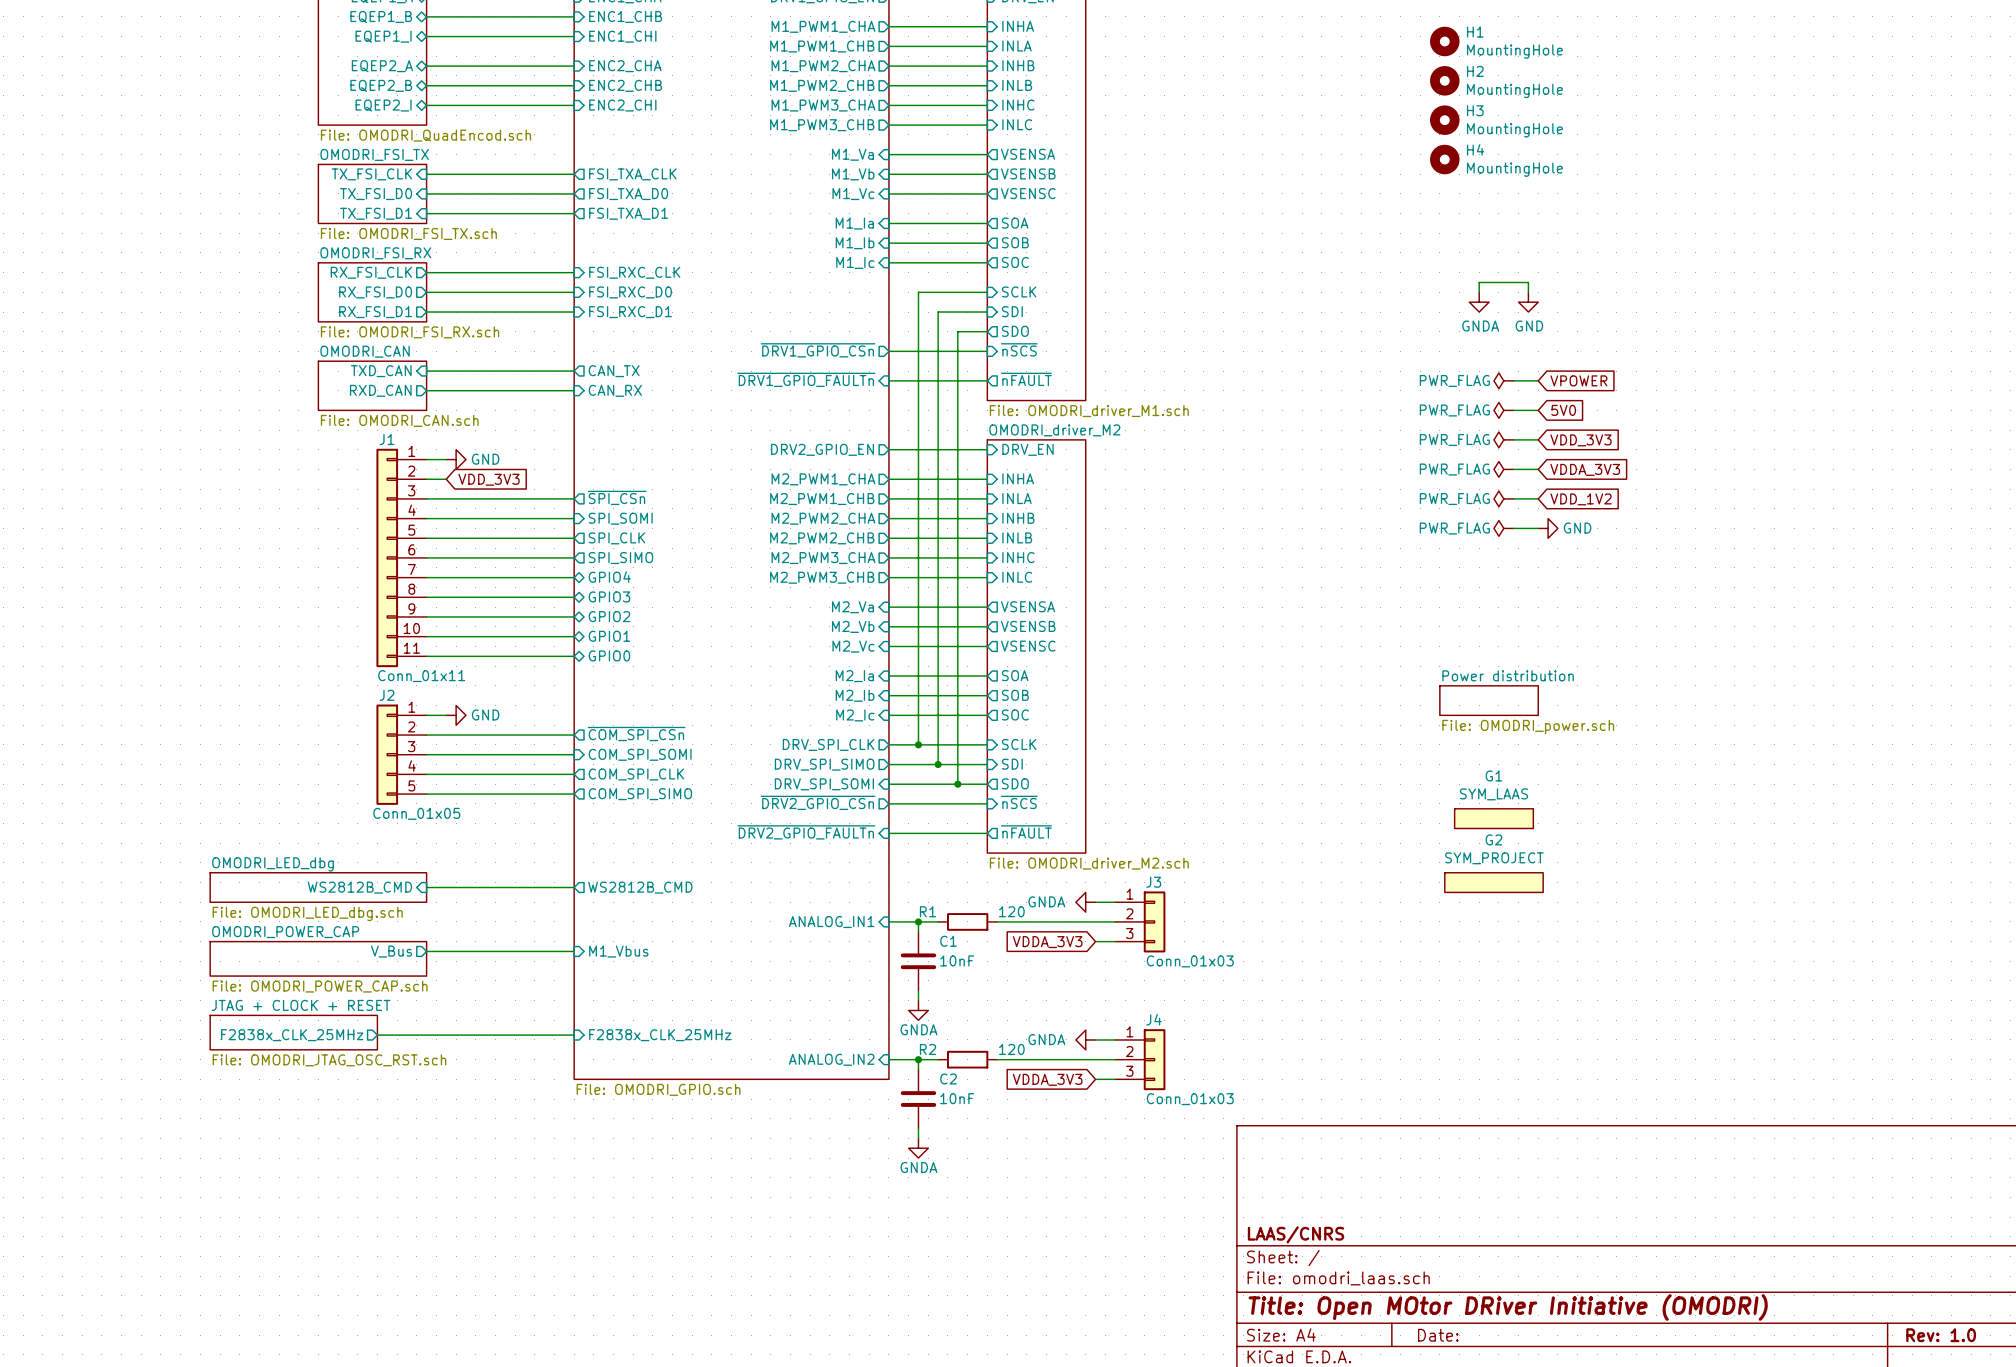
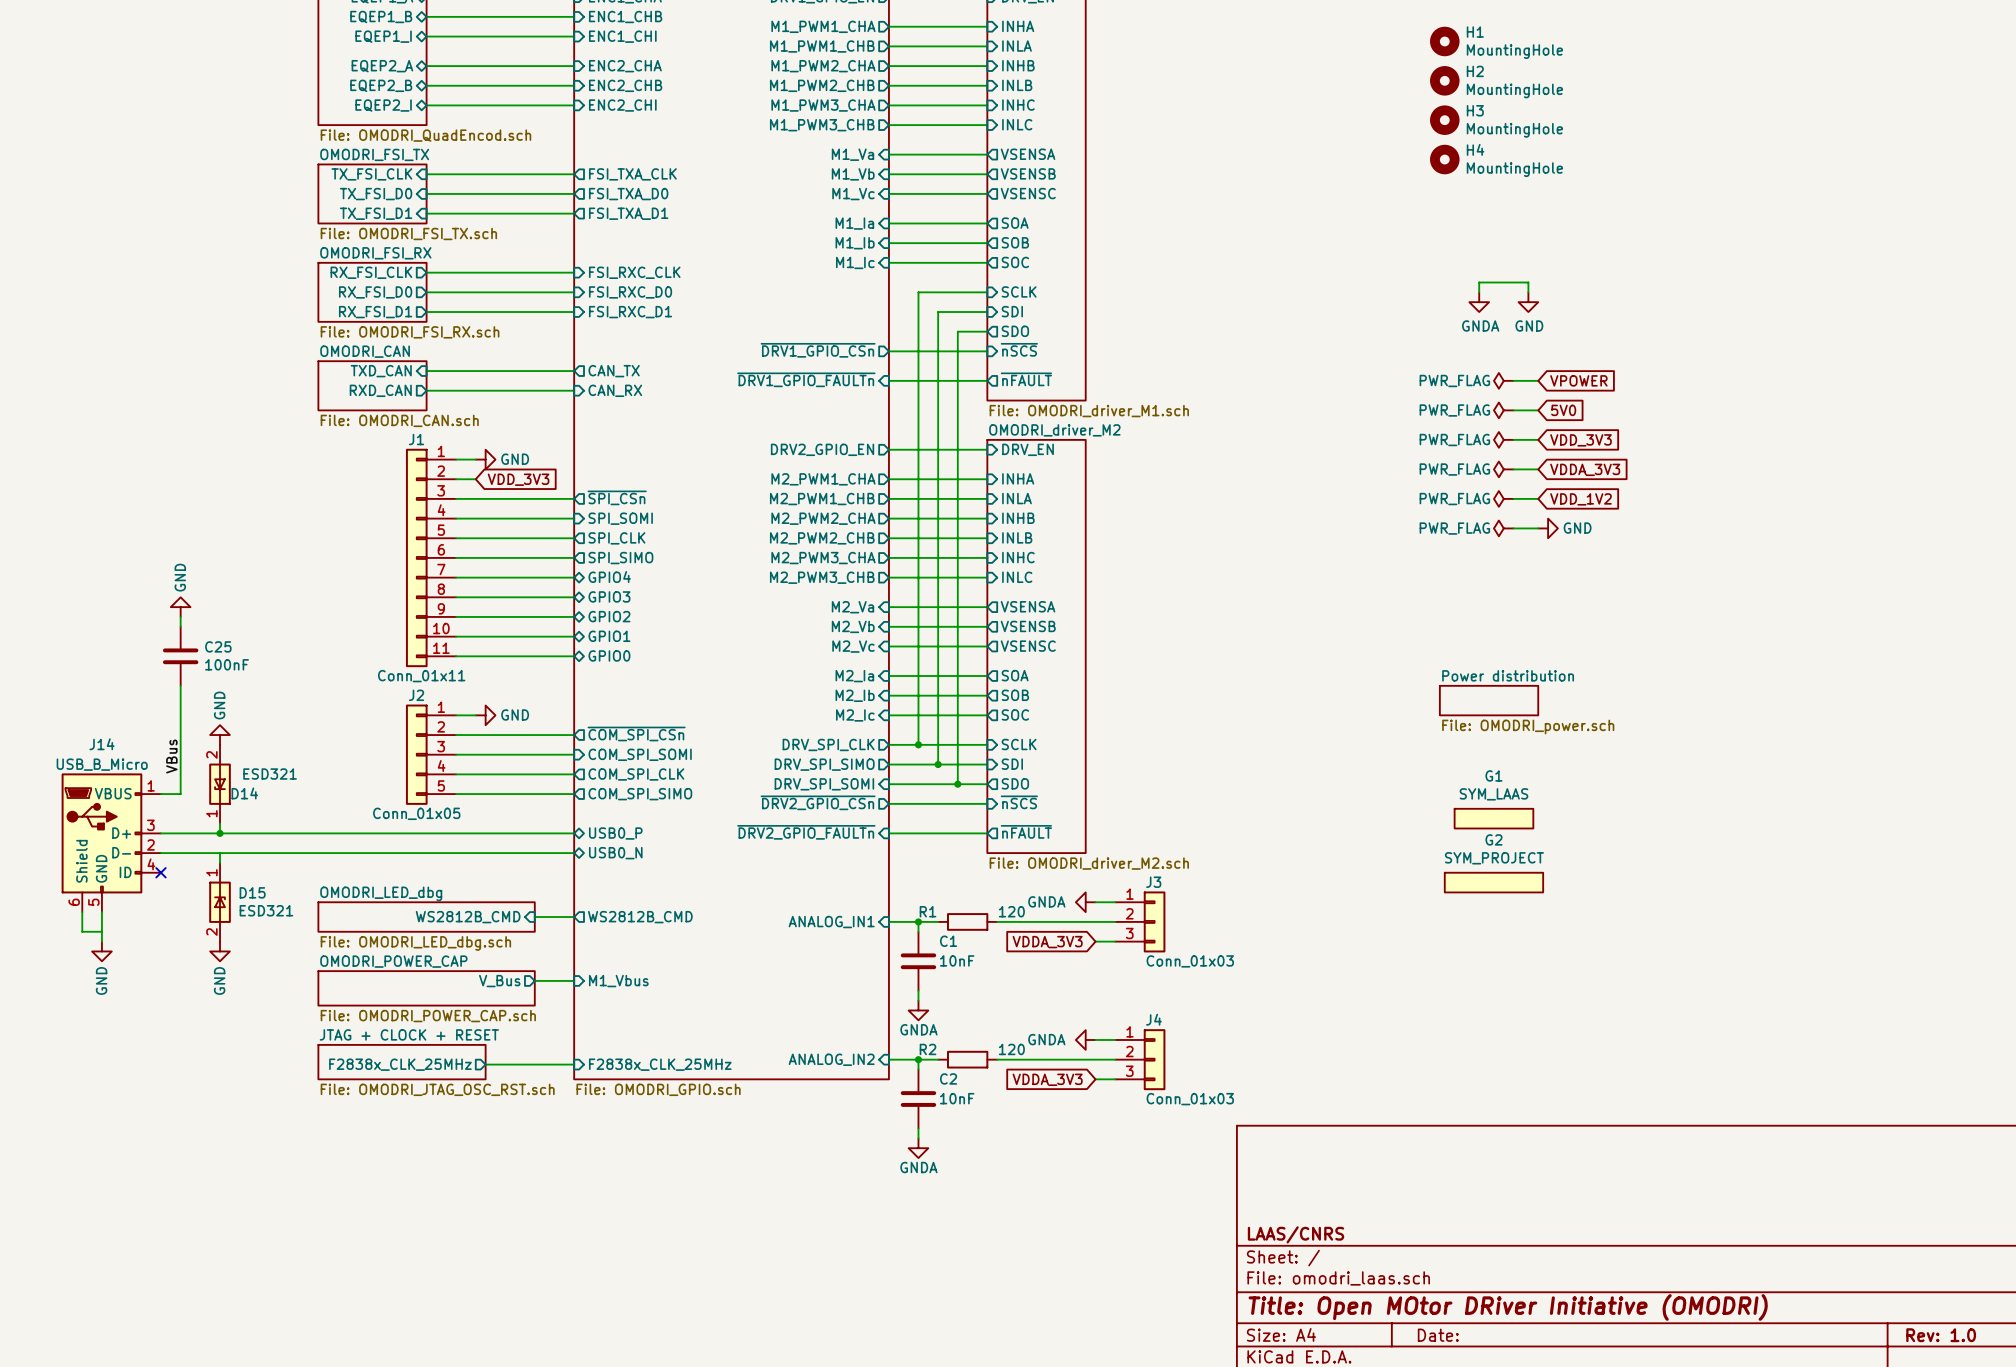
power symbol position: GND (456, 459) -> GND (485, 459)
global label position: VDD_3V3 (489, 479) -> VDD_3V3 (518, 479)
J1 position: (401, 557) -> (431, 557)
power symbol: none -> GND (180, 607)
wire: none -> (180, 616) (180, 626)
C25: none -> 100nF (180, 656)
wire: none -> (180, 685) (180, 794) (160, 794)
power symbol position: GND (456, 715) -> GND (485, 715)
power symbol: none -> GND (220, 735)
J2 position: (401, 754) -> (431, 754)
label: none -> VBus (171, 756)
D14: none -> ESD321 (220, 784)
wire: none -> (220, 823) (220, 833)
wire: none -> (160, 833) (574, 833)
junction: none -> (220, 833)
sheet pin: none -> USB0_P (615, 833)
J14: none -> USB_B_Micro (111, 842)
wire: none -> (160, 853) (574, 853)
wire: none -> (220, 853) (220, 862)
sheet pin: none -> USB0_N (615, 853)
no-connect mark: none -> (160, 872)
sheet OMODRI_LED_dbg position: (318, 887) -> (426, 917)
sheet pin: WS2812B_CMD (359, 887) -> none
wire: (426, 887) (574, 887) -> none
sheet pin position: WS2812B_CMD (640, 887) -> WS2812B_CMD (640, 917)
D15: none -> ESD321 (220, 902)
wire: none -> (82, 912) (82, 931) (101, 931)
wire: none -> (101, 912) (101, 941)
sheet pin: none -> WS2812B_CMD (468, 917)
wire: none -> (534, 917) (574, 917)
power symbol: none -> GND (101, 951)
power symbol: none -> GND (220, 951)
sheet pin position: V_Bus (391, 951) -> V_Bus (499, 981)
wire: (426, 951) (574, 951) -> none
sheet pin position: M1_Vbus (618, 951) -> M1_Vbus (618, 981)
sheet OMODRI_POWER_CAP position: (318, 958) -> (426, 988)
wire: none -> (534, 980) (574, 980)
sheet JTAG + CLOCK + RESET position: (293, 1032) -> (402, 1062)
sheet pin: F2838x_CLK_25MHz (292, 1035) -> none
wire: (377, 1035) (574, 1035) -> none
sheet pin position: F2838x_CLK_25MHz (660, 1035) -> F2838x_CLK_25MHz (660, 1064)
sheet pin: none -> F2838x_CLK_25MHz (400, 1064)
wire: none -> (485, 1064) (574, 1064)

